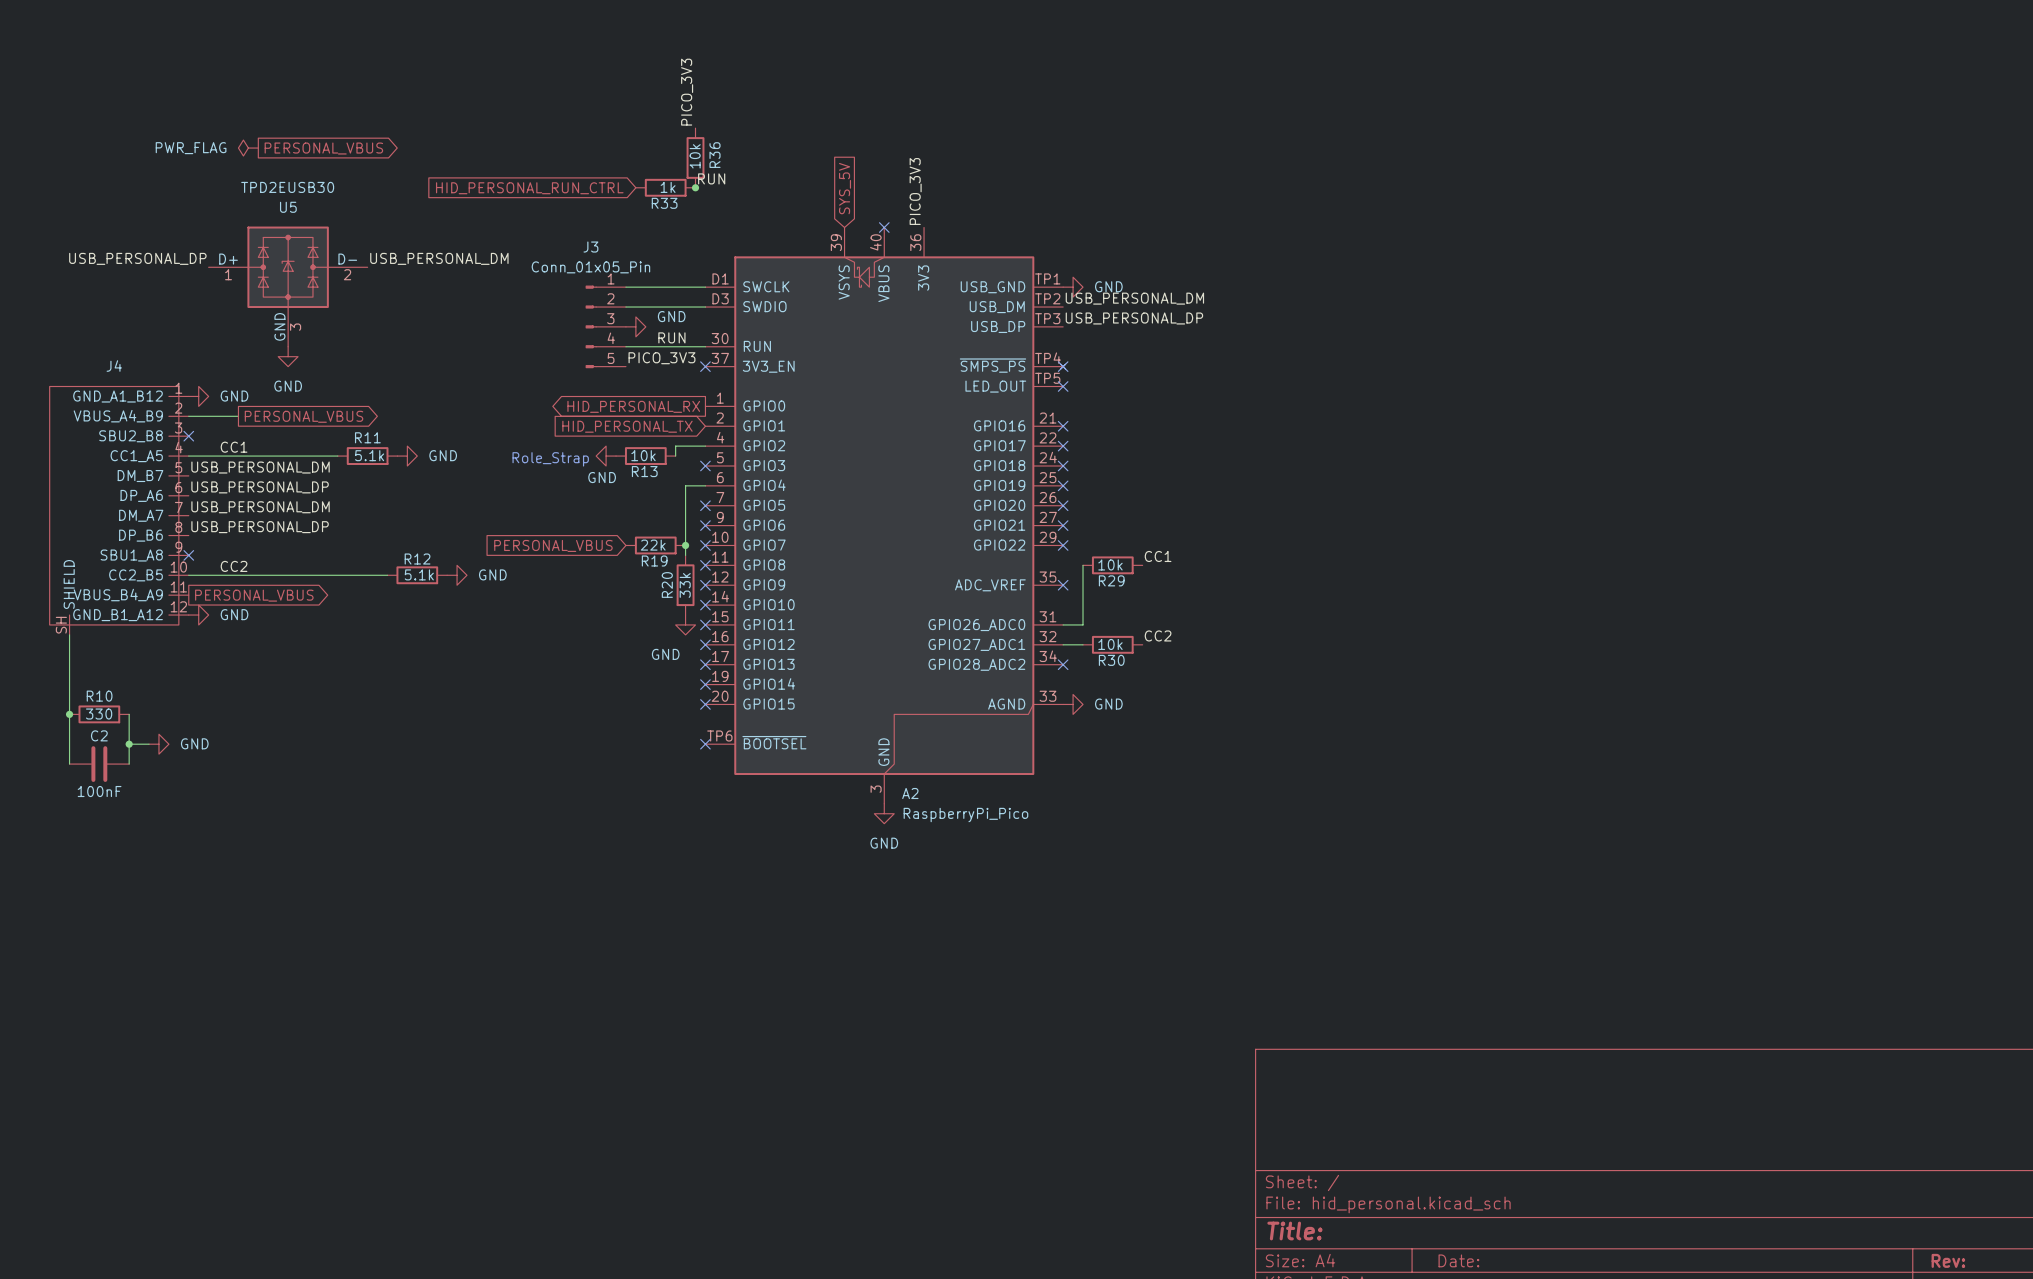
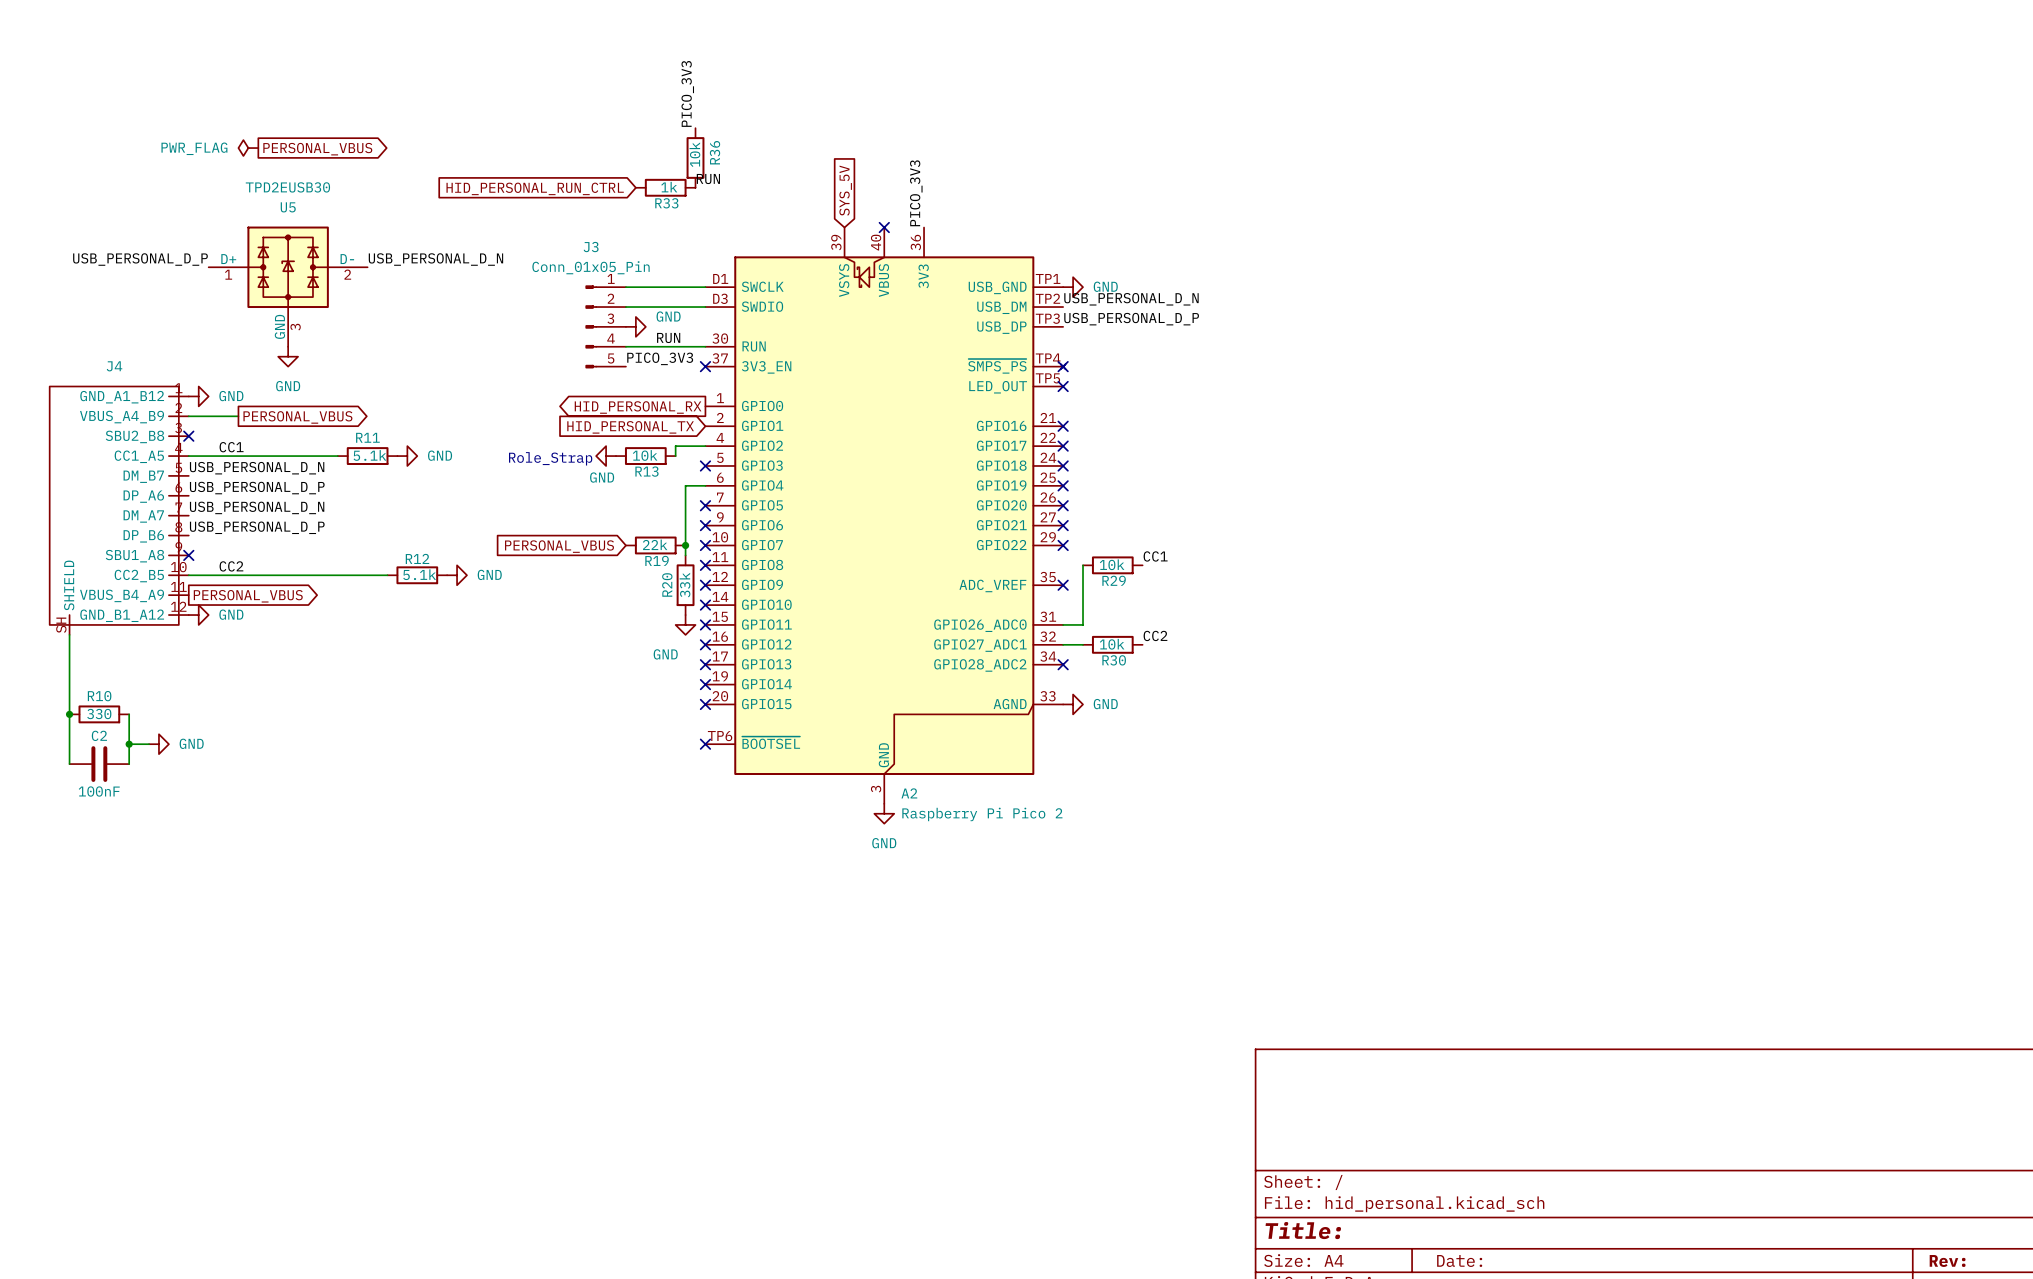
junction: (695, 187) -> none
label: USB_PERSONAL_DP (137, 258) -> USB_PERSONAL_D_P (140, 259)
label: USB_PERSONAL_DM (439, 258) -> USB_PERSONAL_D_N (435, 259)
label: USB_PERSONAL_DM (1134, 298) -> USB_PERSONAL_D_N (1131, 299)
label: USB_PERSONAL_DP (1134, 318) -> USB_PERSONAL_D_P (1131, 319)
label: USB_PERSONAL_DM (260, 467) -> USB_PERSONAL_D_N (257, 468)
label: USB_PERSONAL_DP (260, 487) -> USB_PERSONAL_D_P (257, 488)
label: USB_PERSONAL_DM (260, 507) -> USB_PERSONAL_D_N (257, 507)
label: USB_PERSONAL_DP (260, 527) -> USB_PERSONAL_D_P (257, 527)
A2 value: RaspberryPi_Pico (965, 815) -> Raspberry Pi Pico 2 (982, 814)

